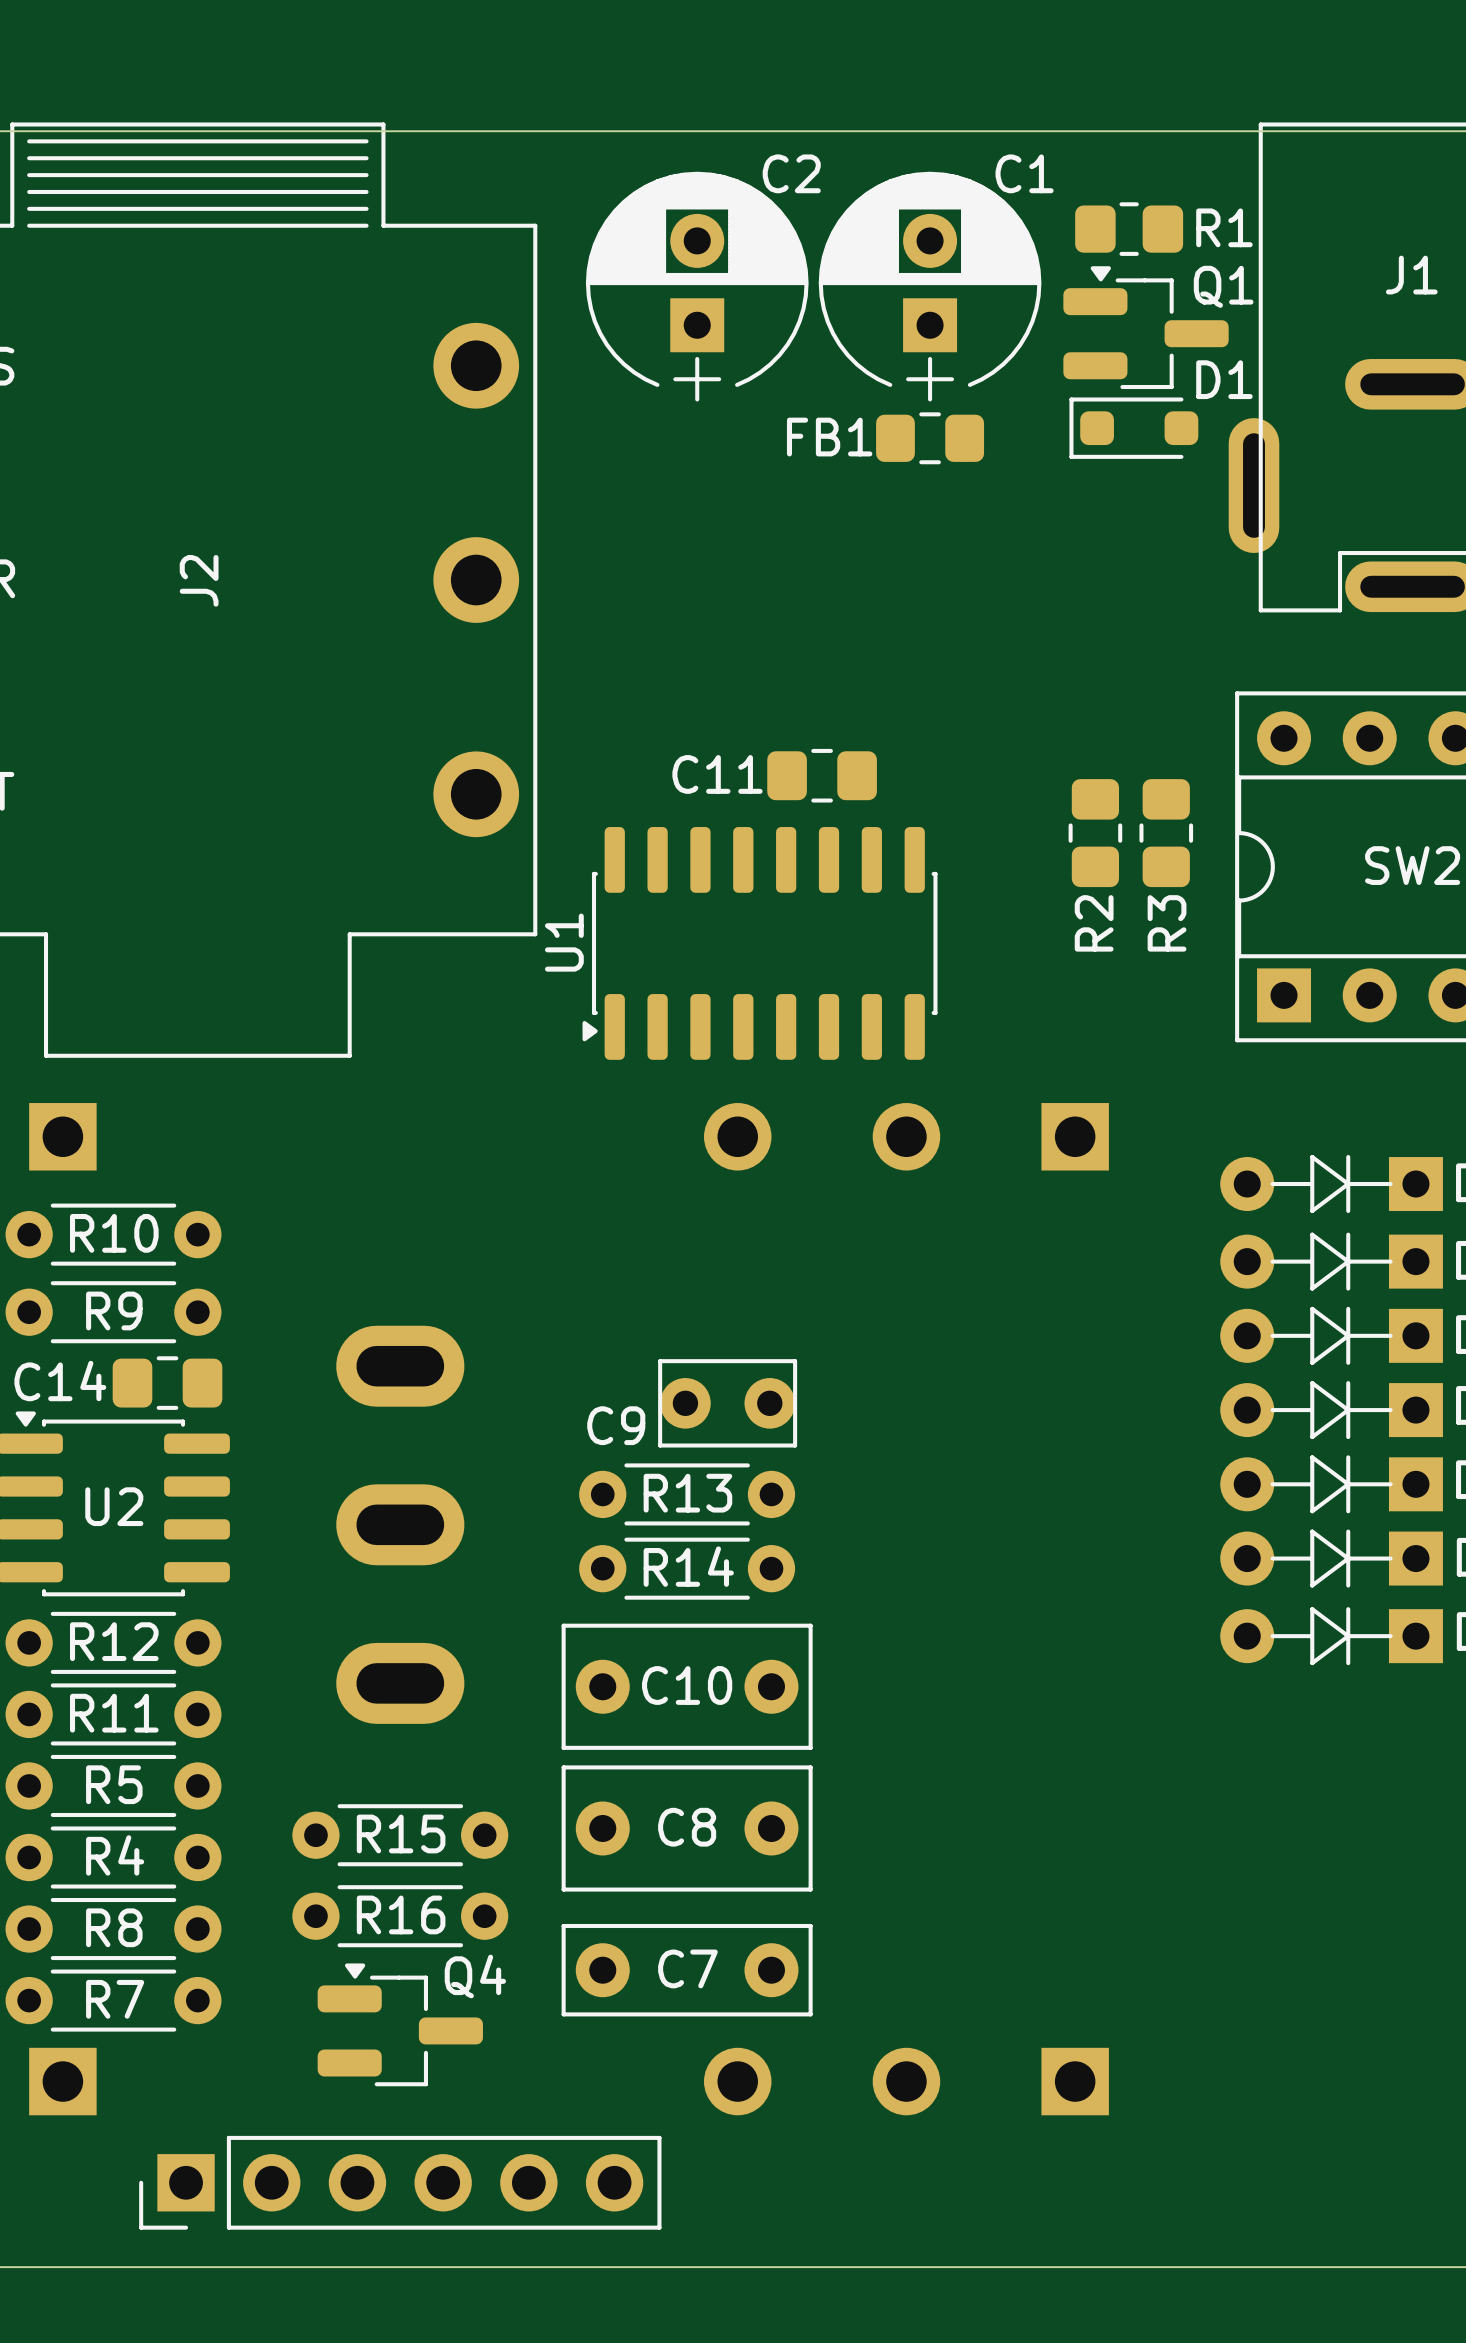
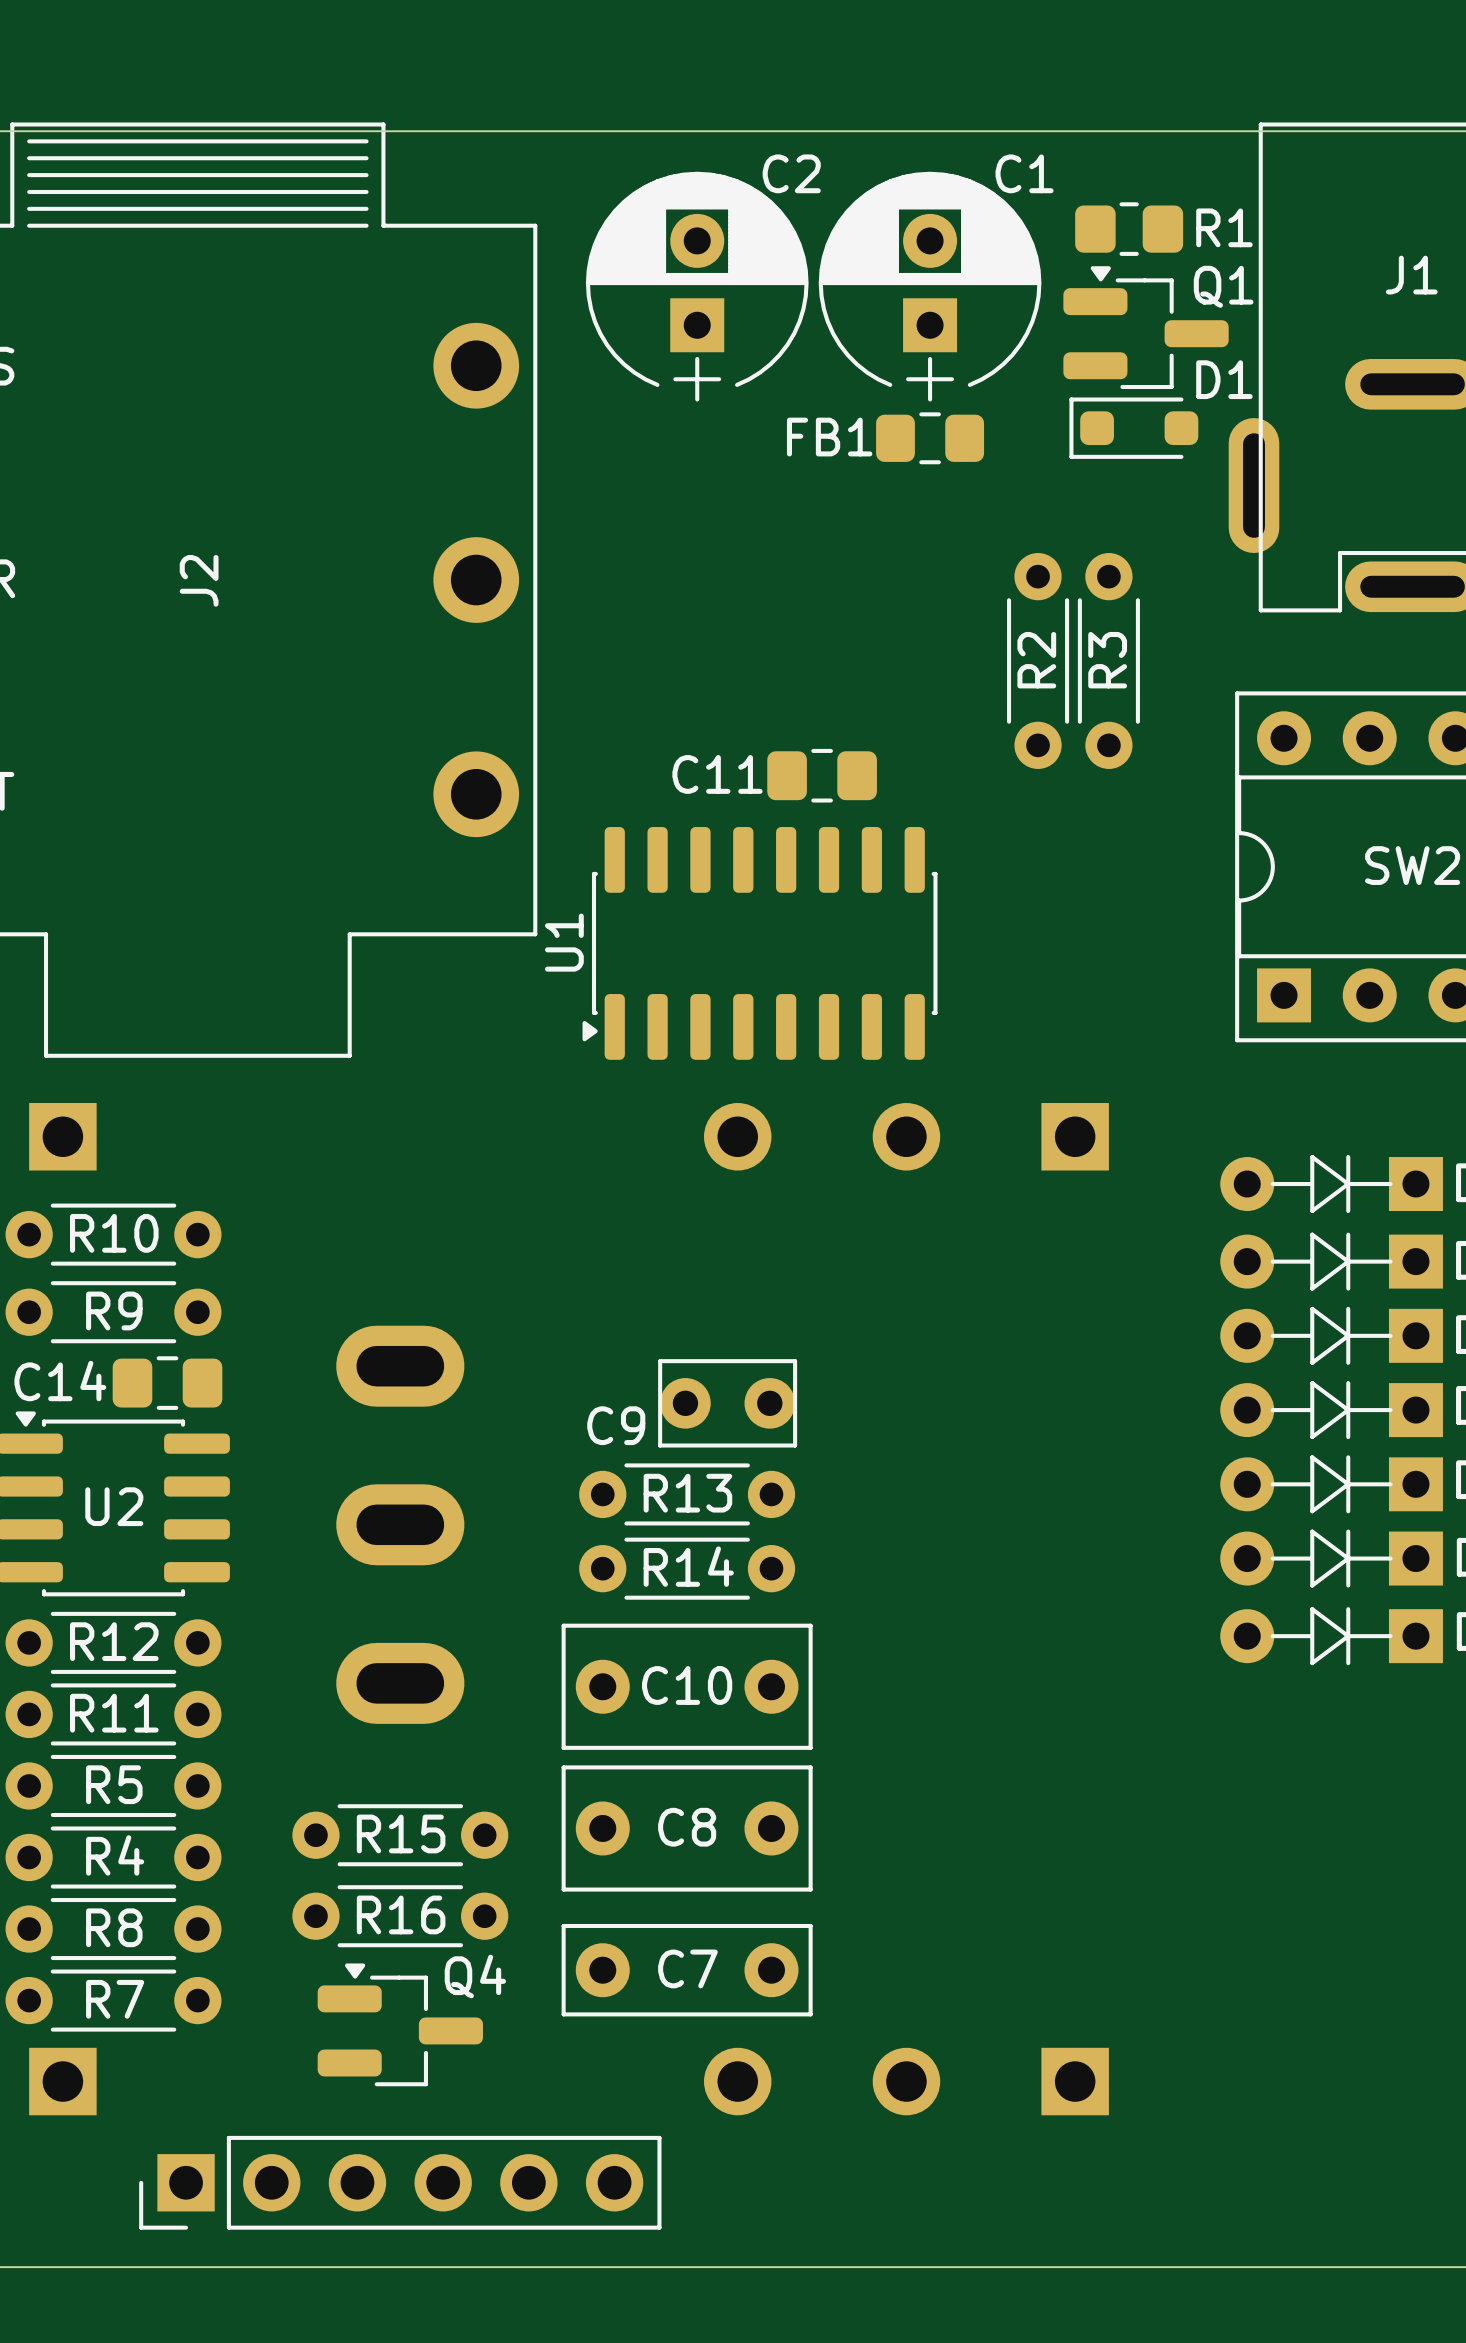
R2 footprint: [1068, 779, 1123, 888] -> [1007, 553, 1070, 769]
R3 footprint: [1139, 779, 1194, 888] -> [1077, 553, 1140, 769]
R2 name position: R2 (1094, 923) -> R2 (1036, 660)
R3 name position: R3 (1167, 923) -> R3 (1107, 660)

